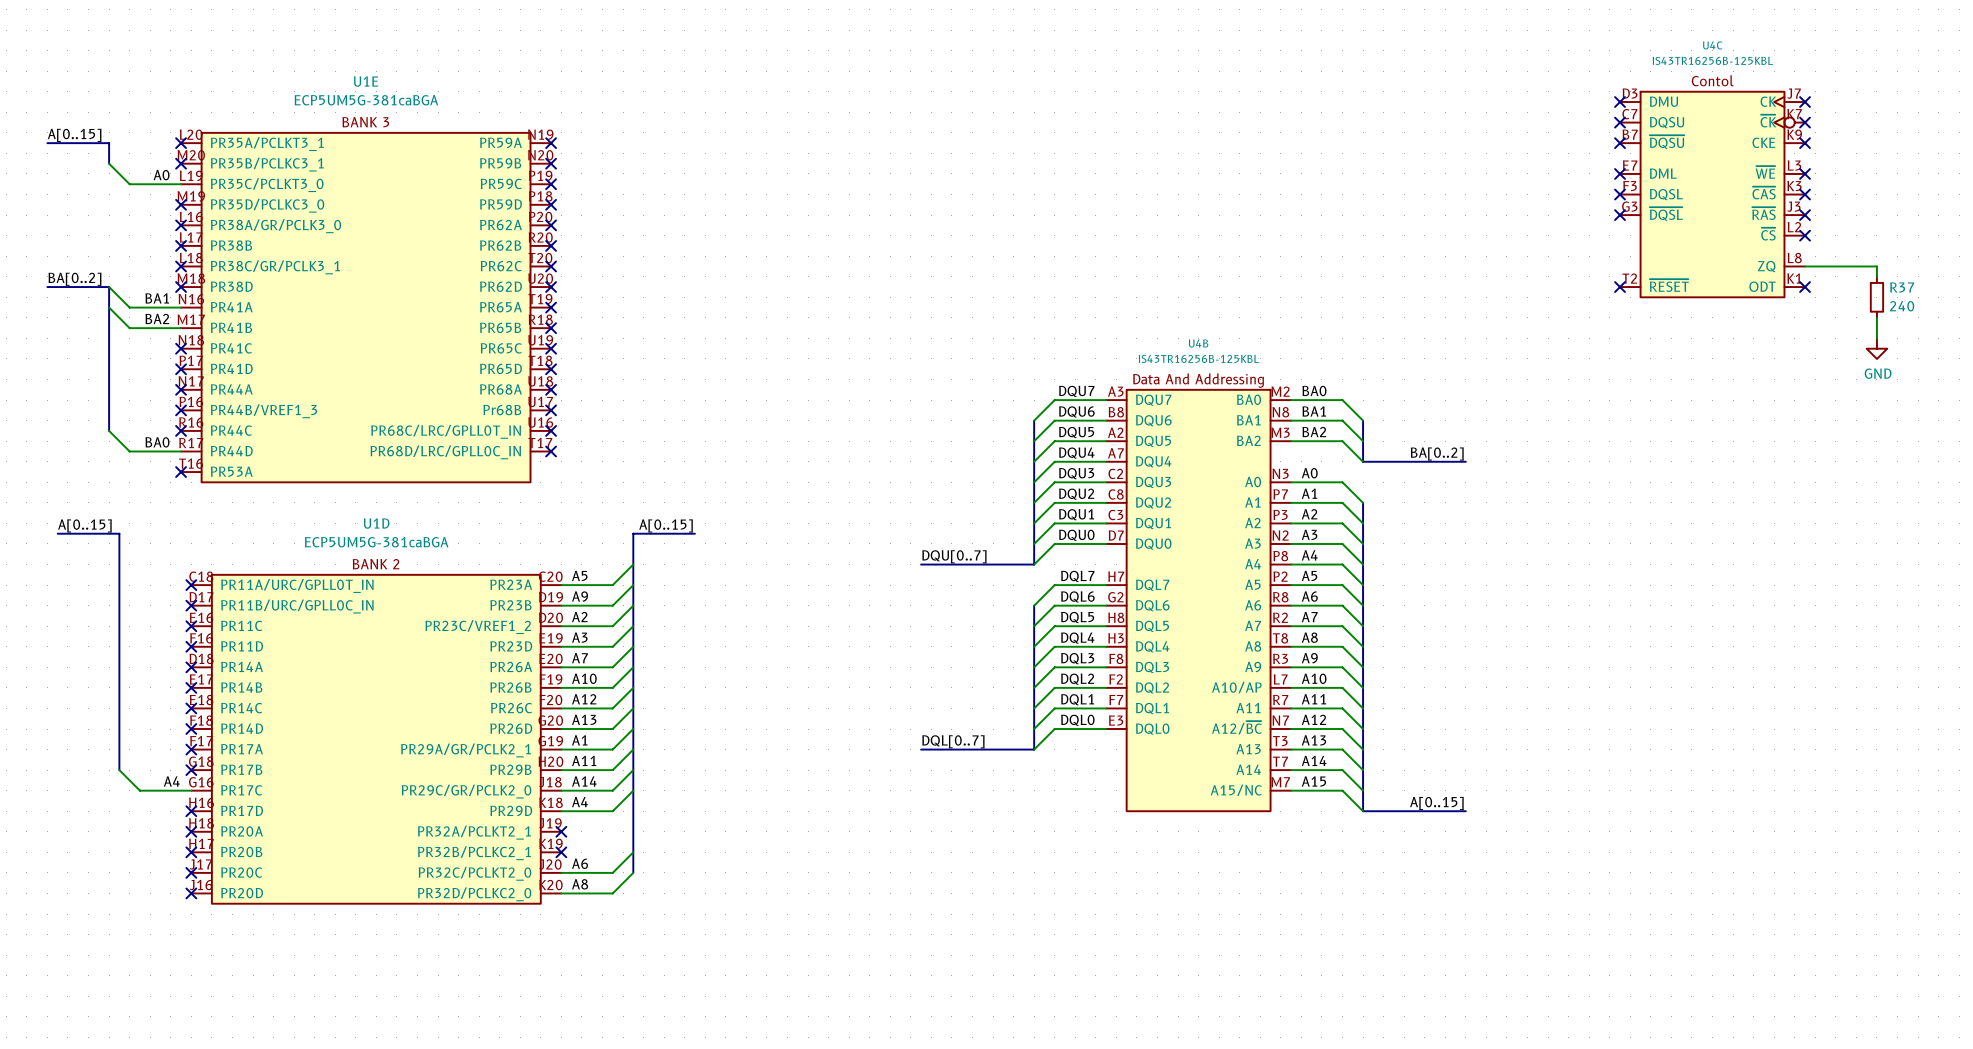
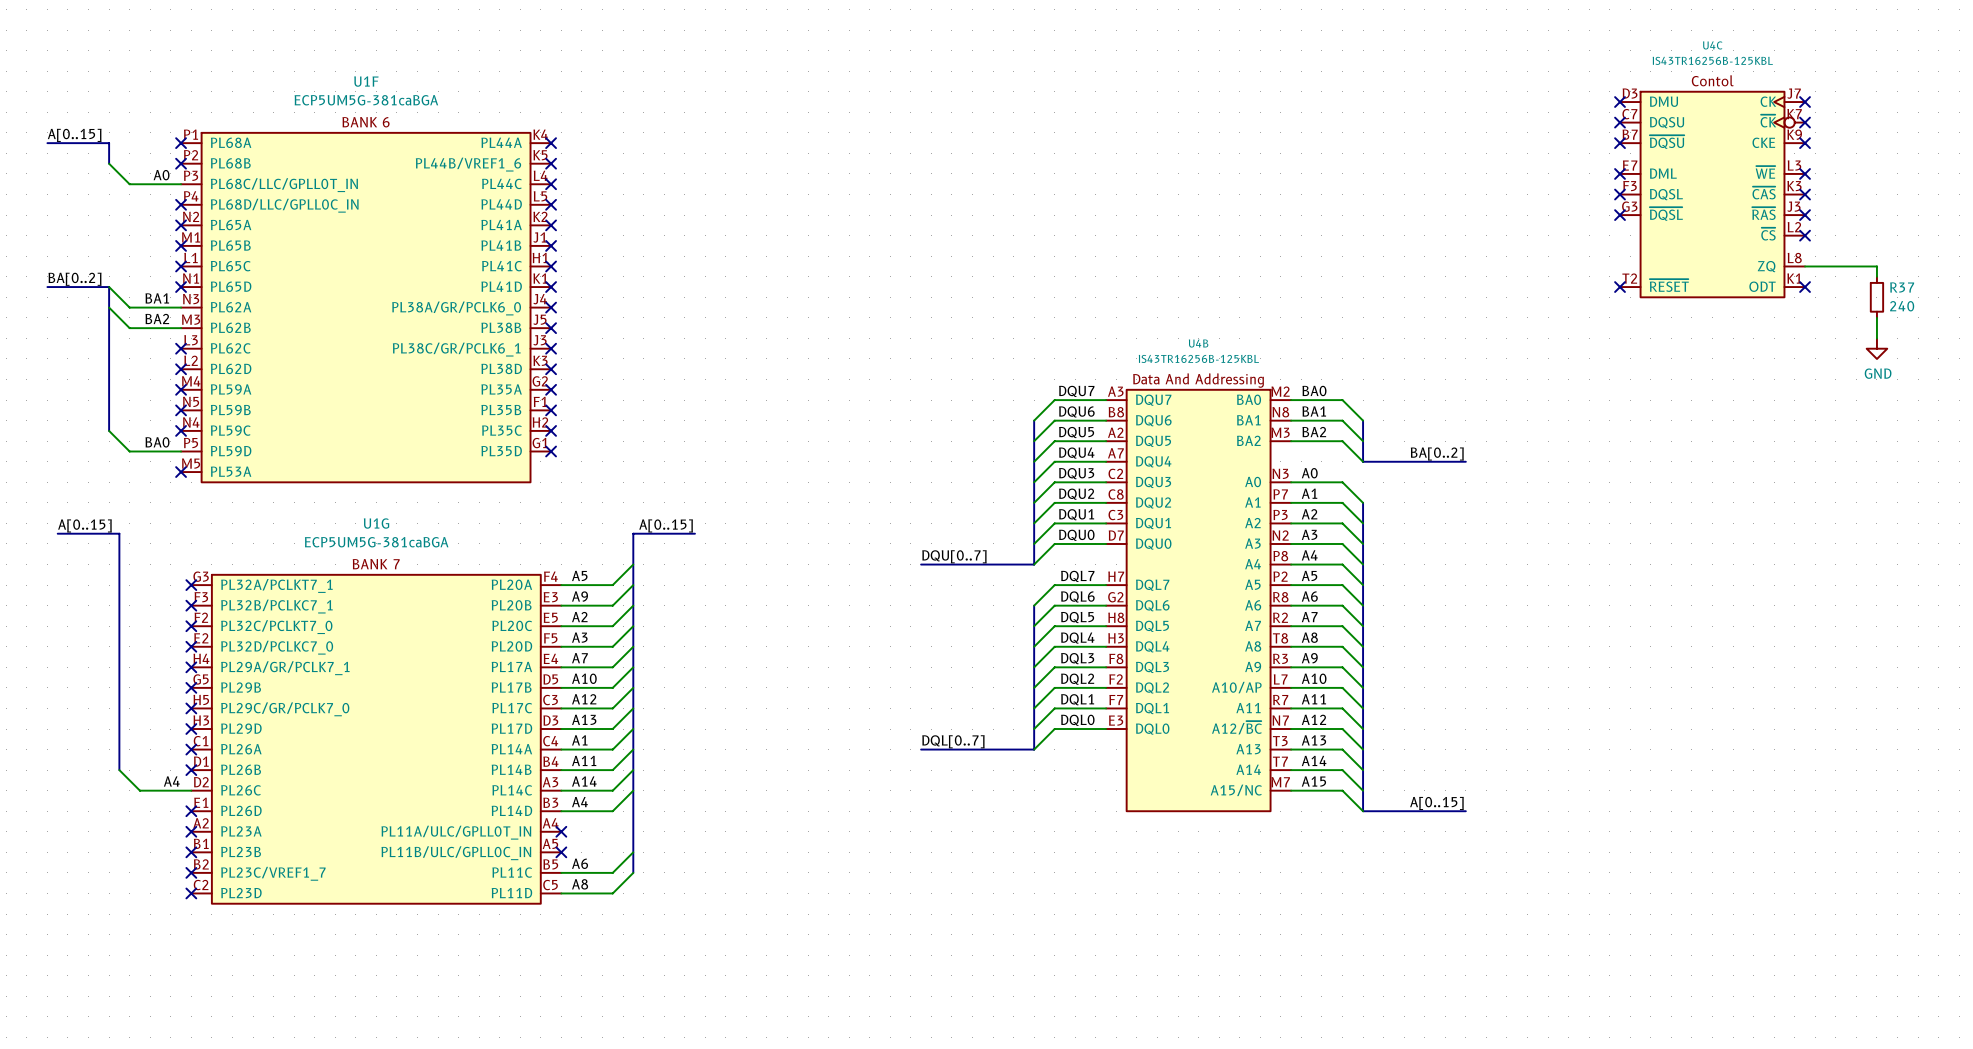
U1E name: U1E (366, 81) -> U1F (366, 81)
U1E symbol: [181, 132, 552, 483] -> [181, 132, 552, 483]
U1D name: U1D (376, 523) -> U1G (376, 523)
U1D symbol: [191, 574, 562, 904] -> [191, 574, 562, 904]

